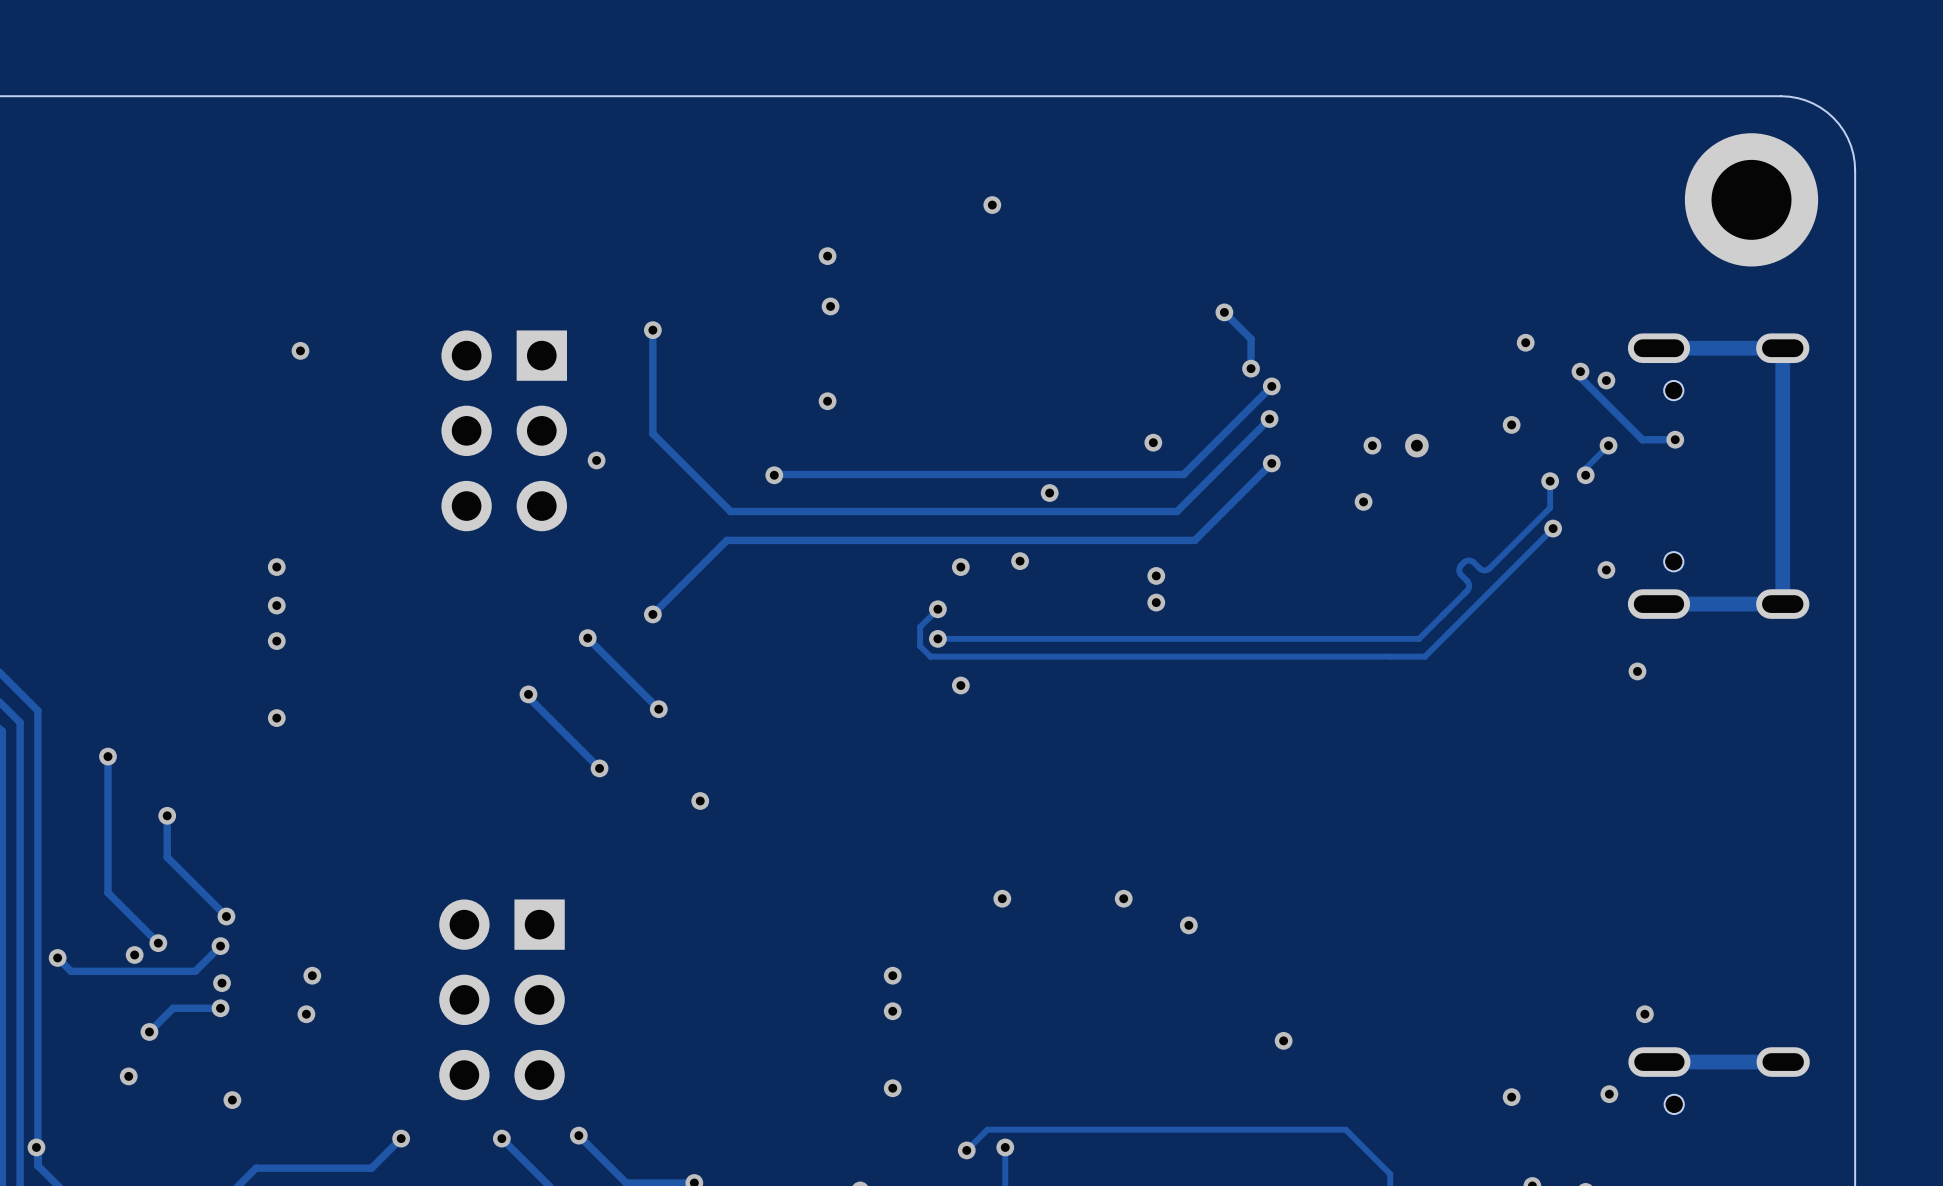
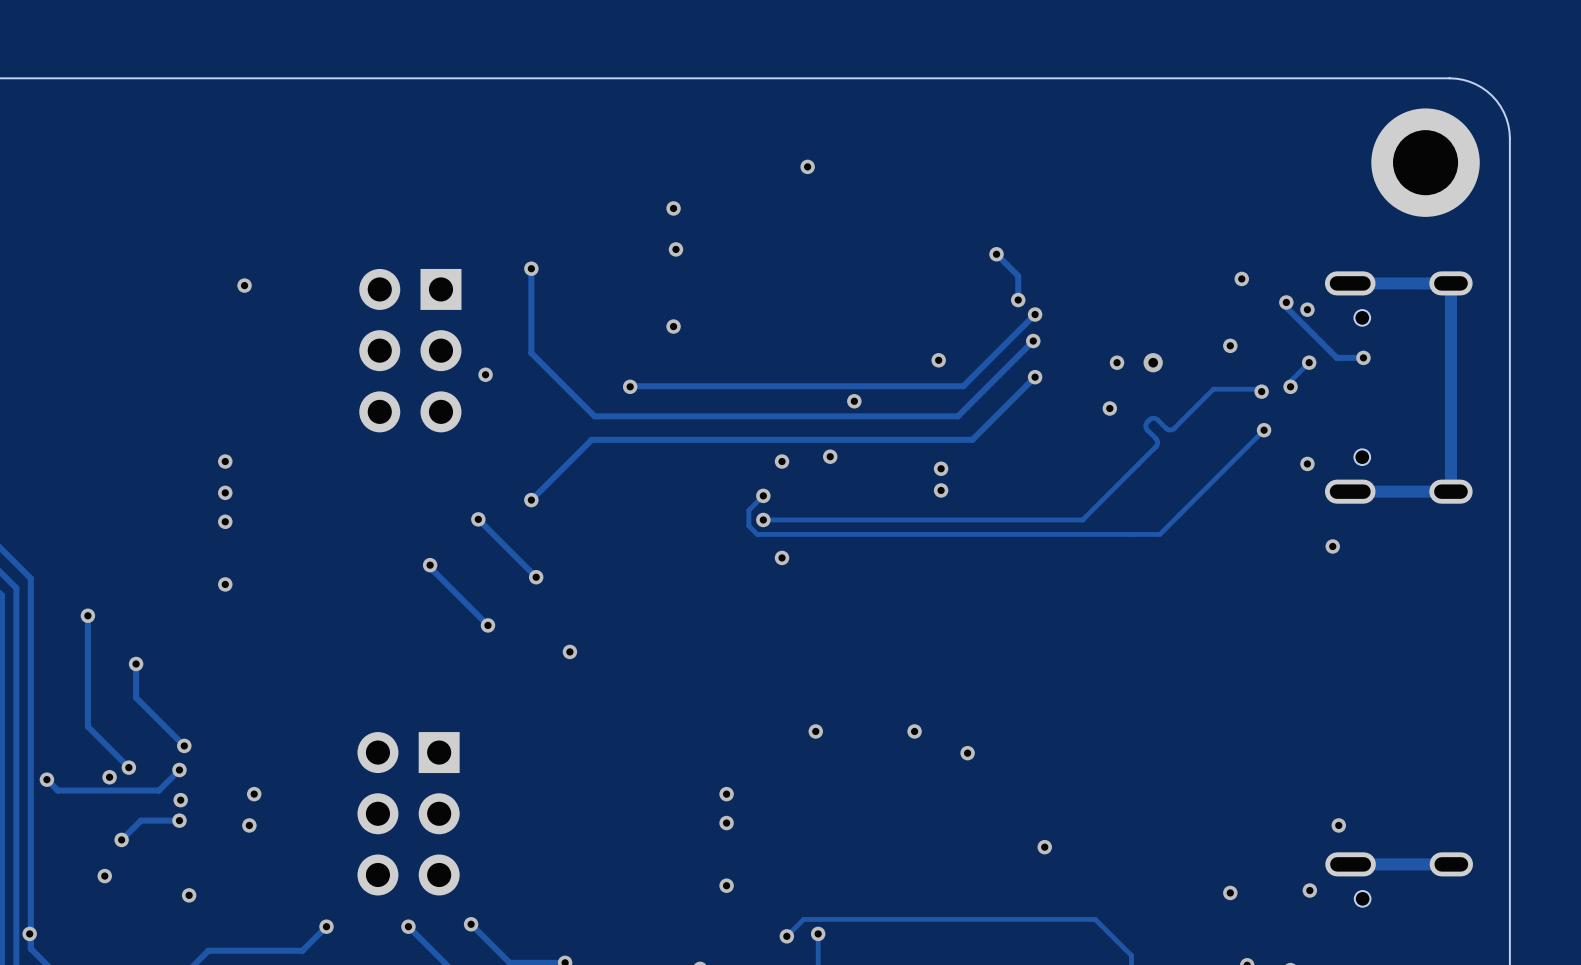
track: (1550, 481) (1550, 507) (1488, 569) (1481, 569) (1470, 560) (1463, 562) (1459, 570) (1468, 582) (1468, 589) (1419, 638) (1330, 638) -> (1261, 391) (1259, 389) (1213, 389) (1171, 429) (1166, 428) (1155, 418) (1150, 419) (1145, 427) (1156, 439) (1156, 446) (1082, 519)

